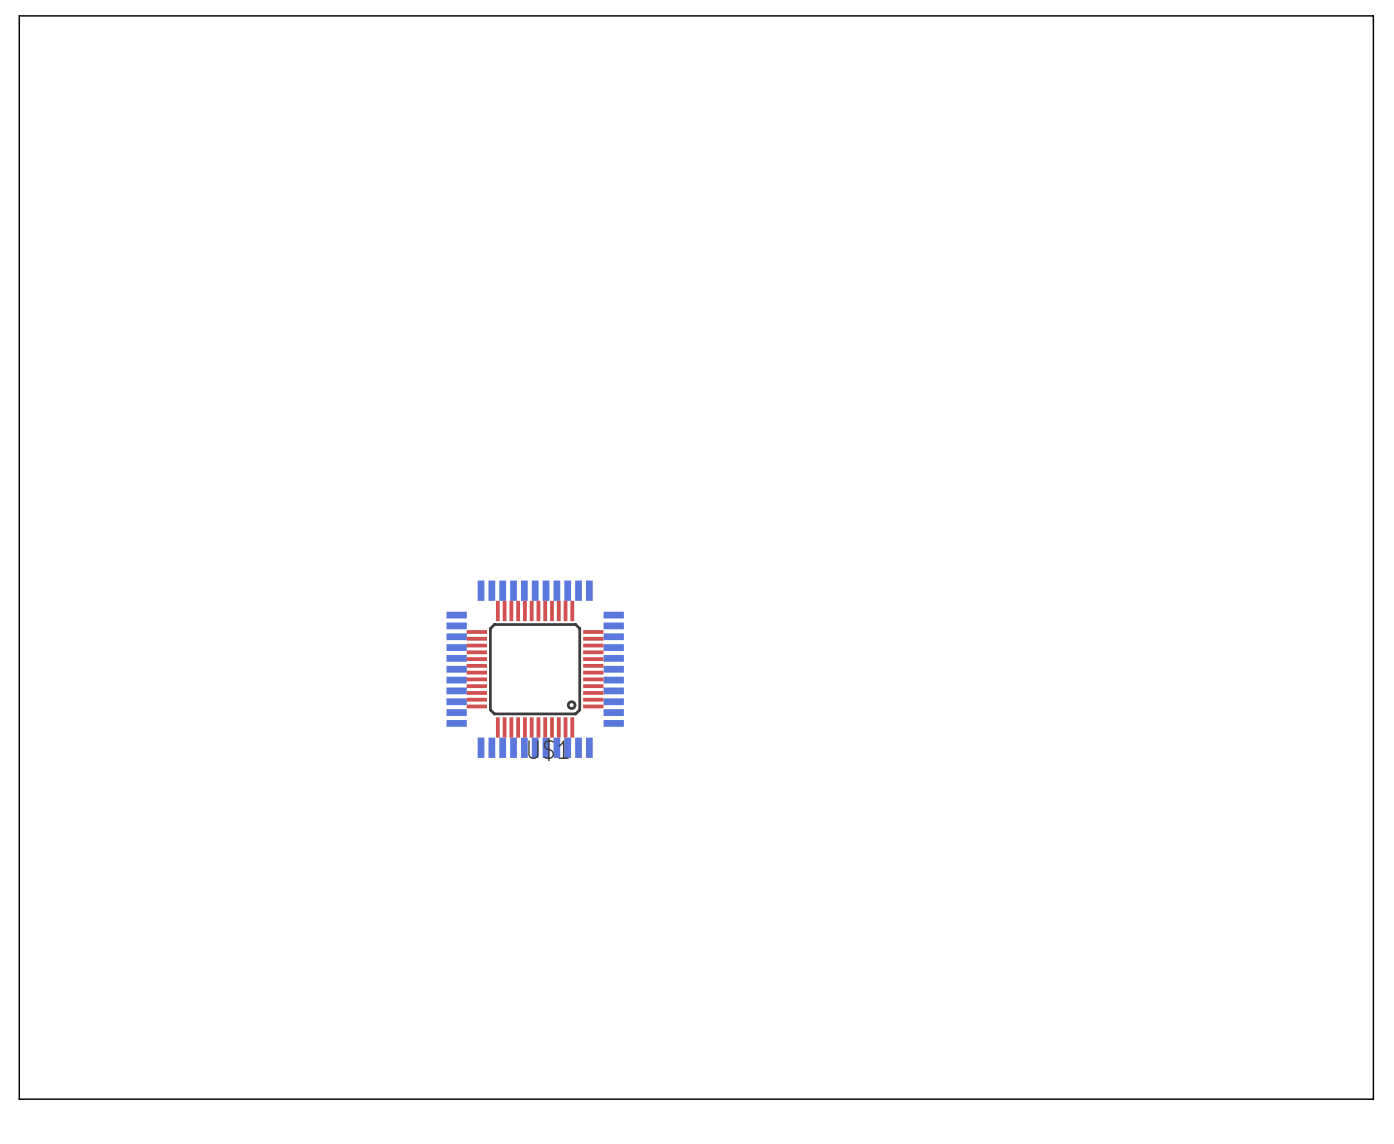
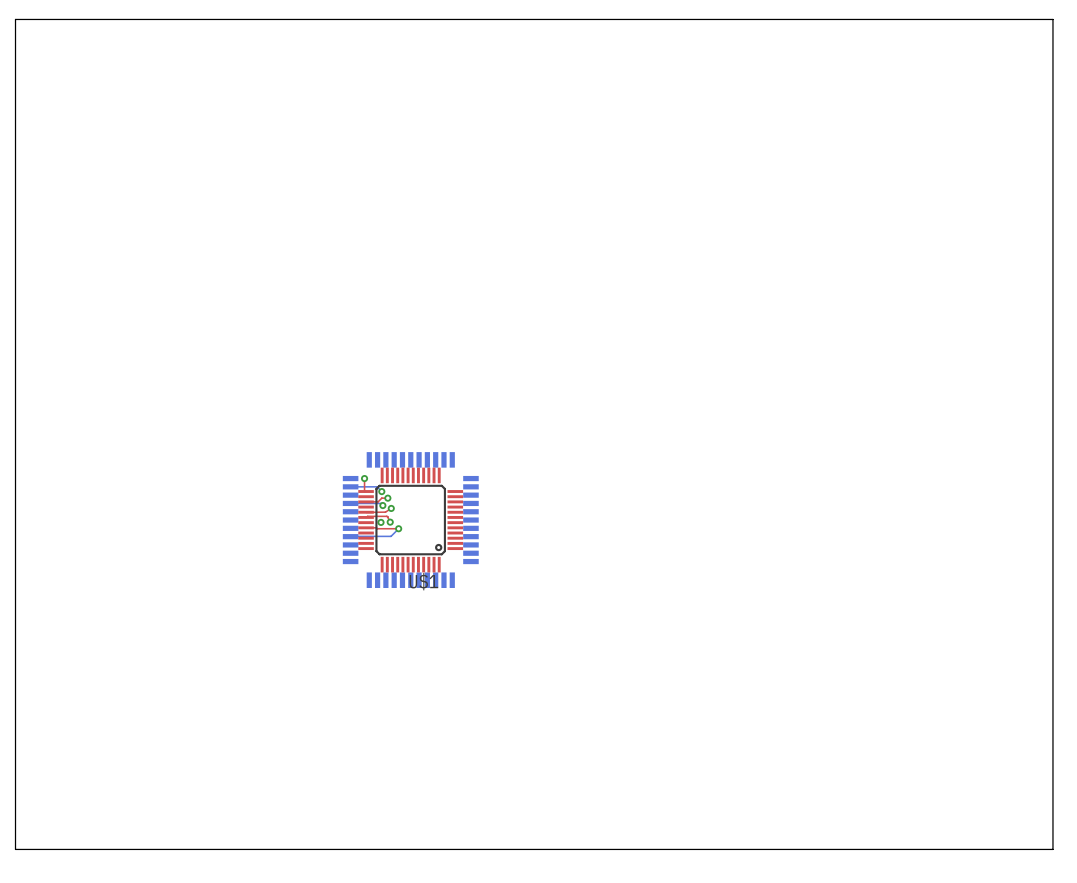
top track: none -> (364, 478) (364, 491) (366, 491)
via: none -> (364, 478)
bottom track: none -> (350, 486) (377, 486) (381, 491)
via: none -> (381, 491)
top track: none -> (388, 498) (381, 498) (378, 501) (366, 501)
via: none -> (387, 498)
bottom track: none -> (350, 503) (381, 503)
via: none -> (382, 505)
top track: none -> (391, 508) (385, 512) (366, 512)
via: none -> (391, 508)
top track: none -> (366, 517) (386, 516) (390, 522)
via: none -> (390, 522)
via: none -> (381, 522)
top track: none -> (366, 527) (398, 528)
bottom track: none -> (398, 528) (391, 536) (350, 536)
via: none -> (398, 528)

